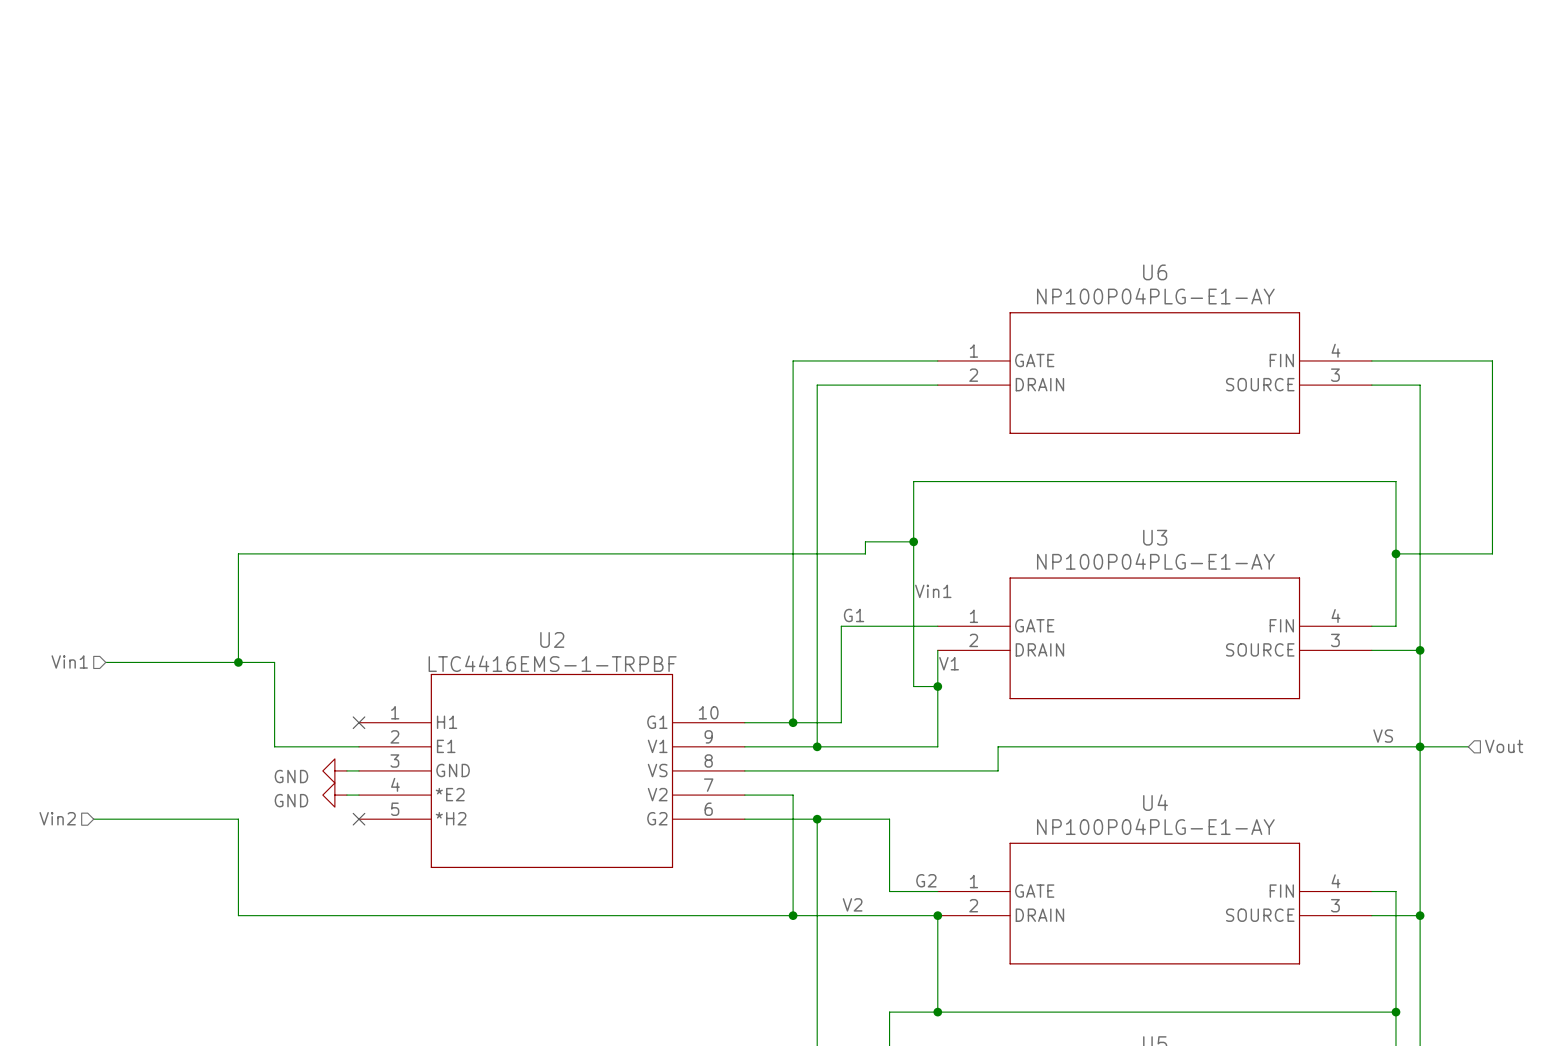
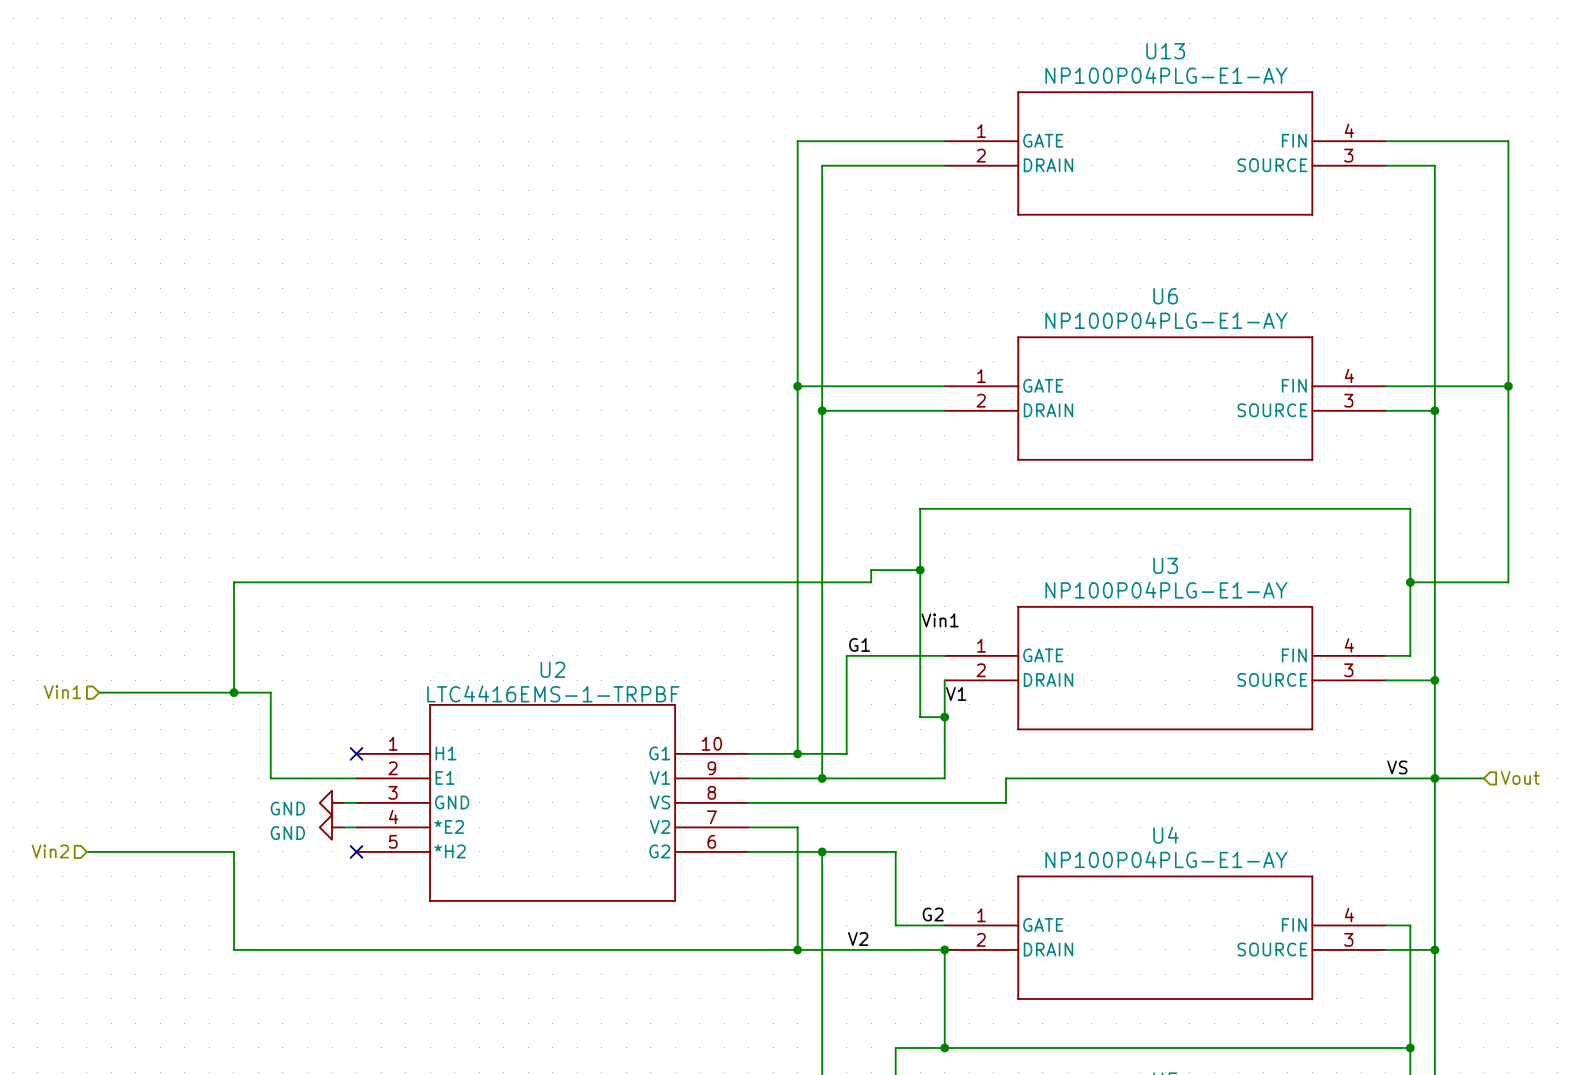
wire: none -> (944, 141) (797, 141) (797, 386)
wire: none -> (1385, 141) (1508, 141) (1508, 386)
U13: none -> NP100P04PLG-E1-AY (1165, 153)
wire: none -> (944, 165) (822, 165) (822, 410)
wire: none -> (1385, 165) (1434, 165) (1434, 410)
junction: none -> (797, 386)
junction: none -> (1508, 386)
junction: none -> (822, 410)
junction: none -> (1434, 410)

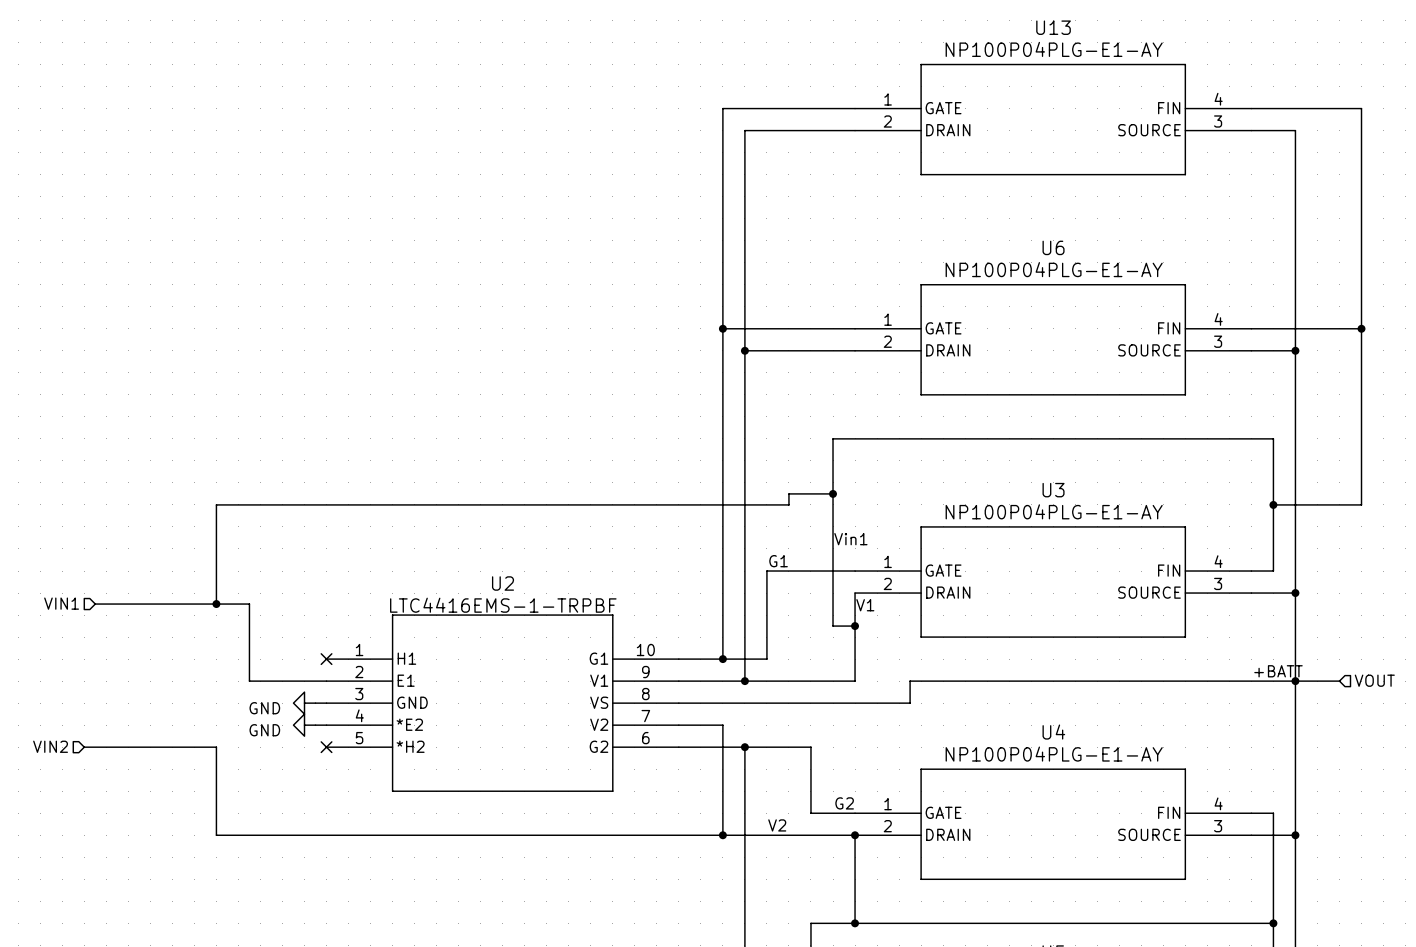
hierarchical label: Vin1 (62, 692) -> VIN1 (61, 603)
label: VS (1397, 767) -> +BATT (1278, 671)
hierarchical label: Vout (1520, 777) -> VOUT (1374, 680)
hierarchical label: Vin2 (50, 851) -> VIN2 (50, 746)

